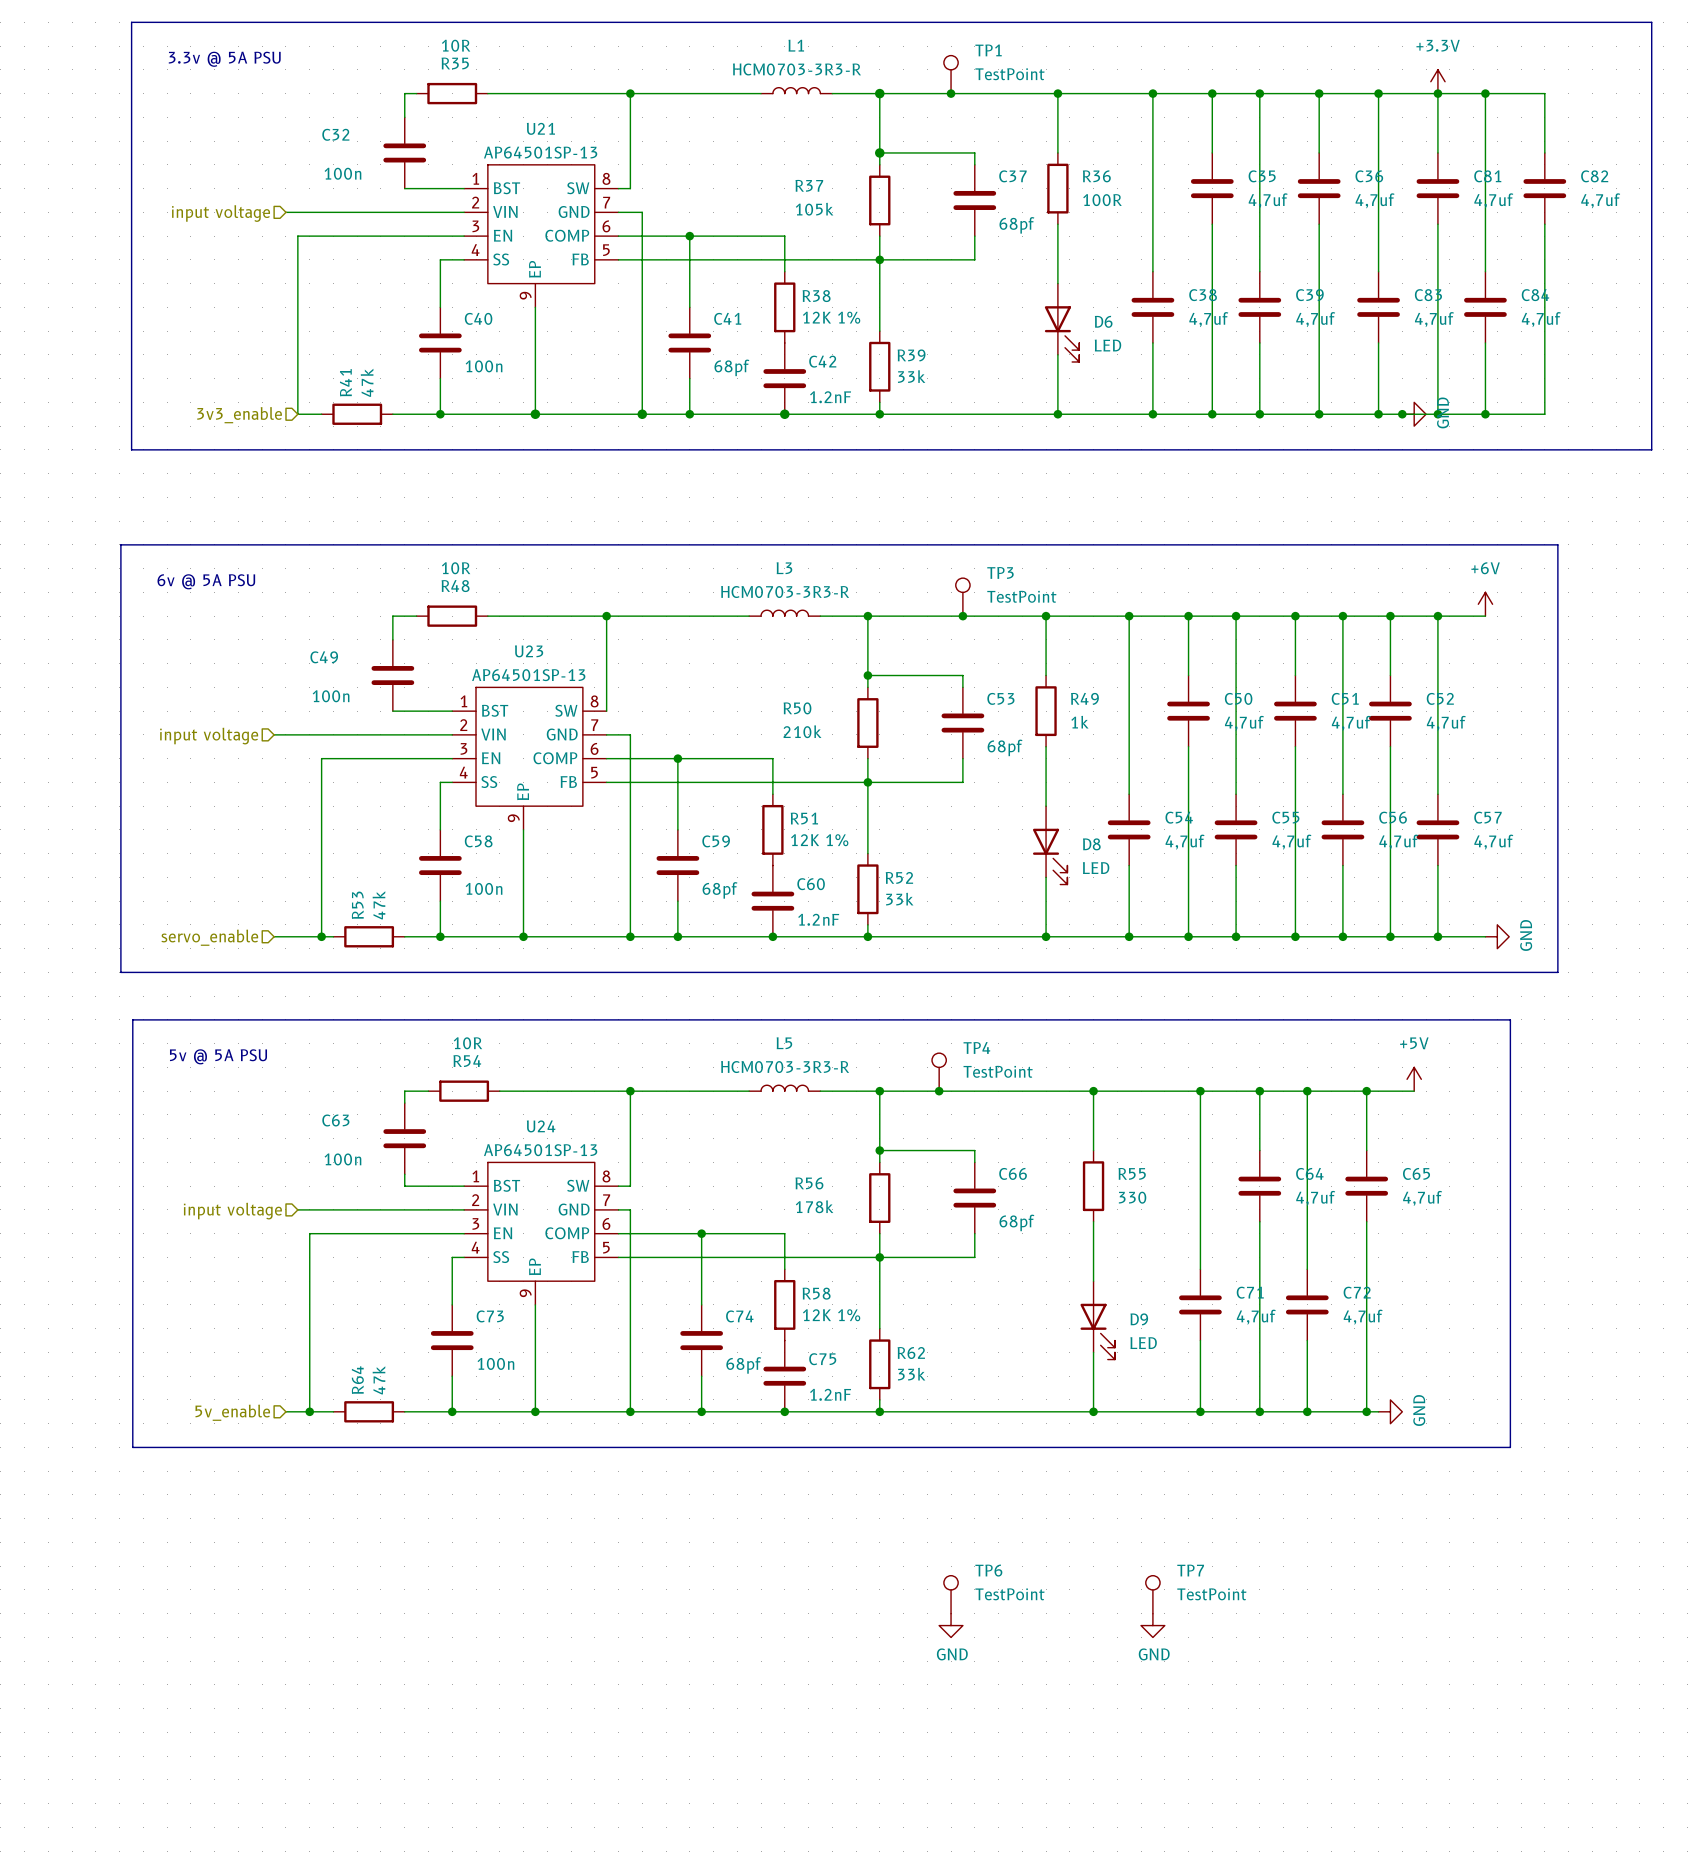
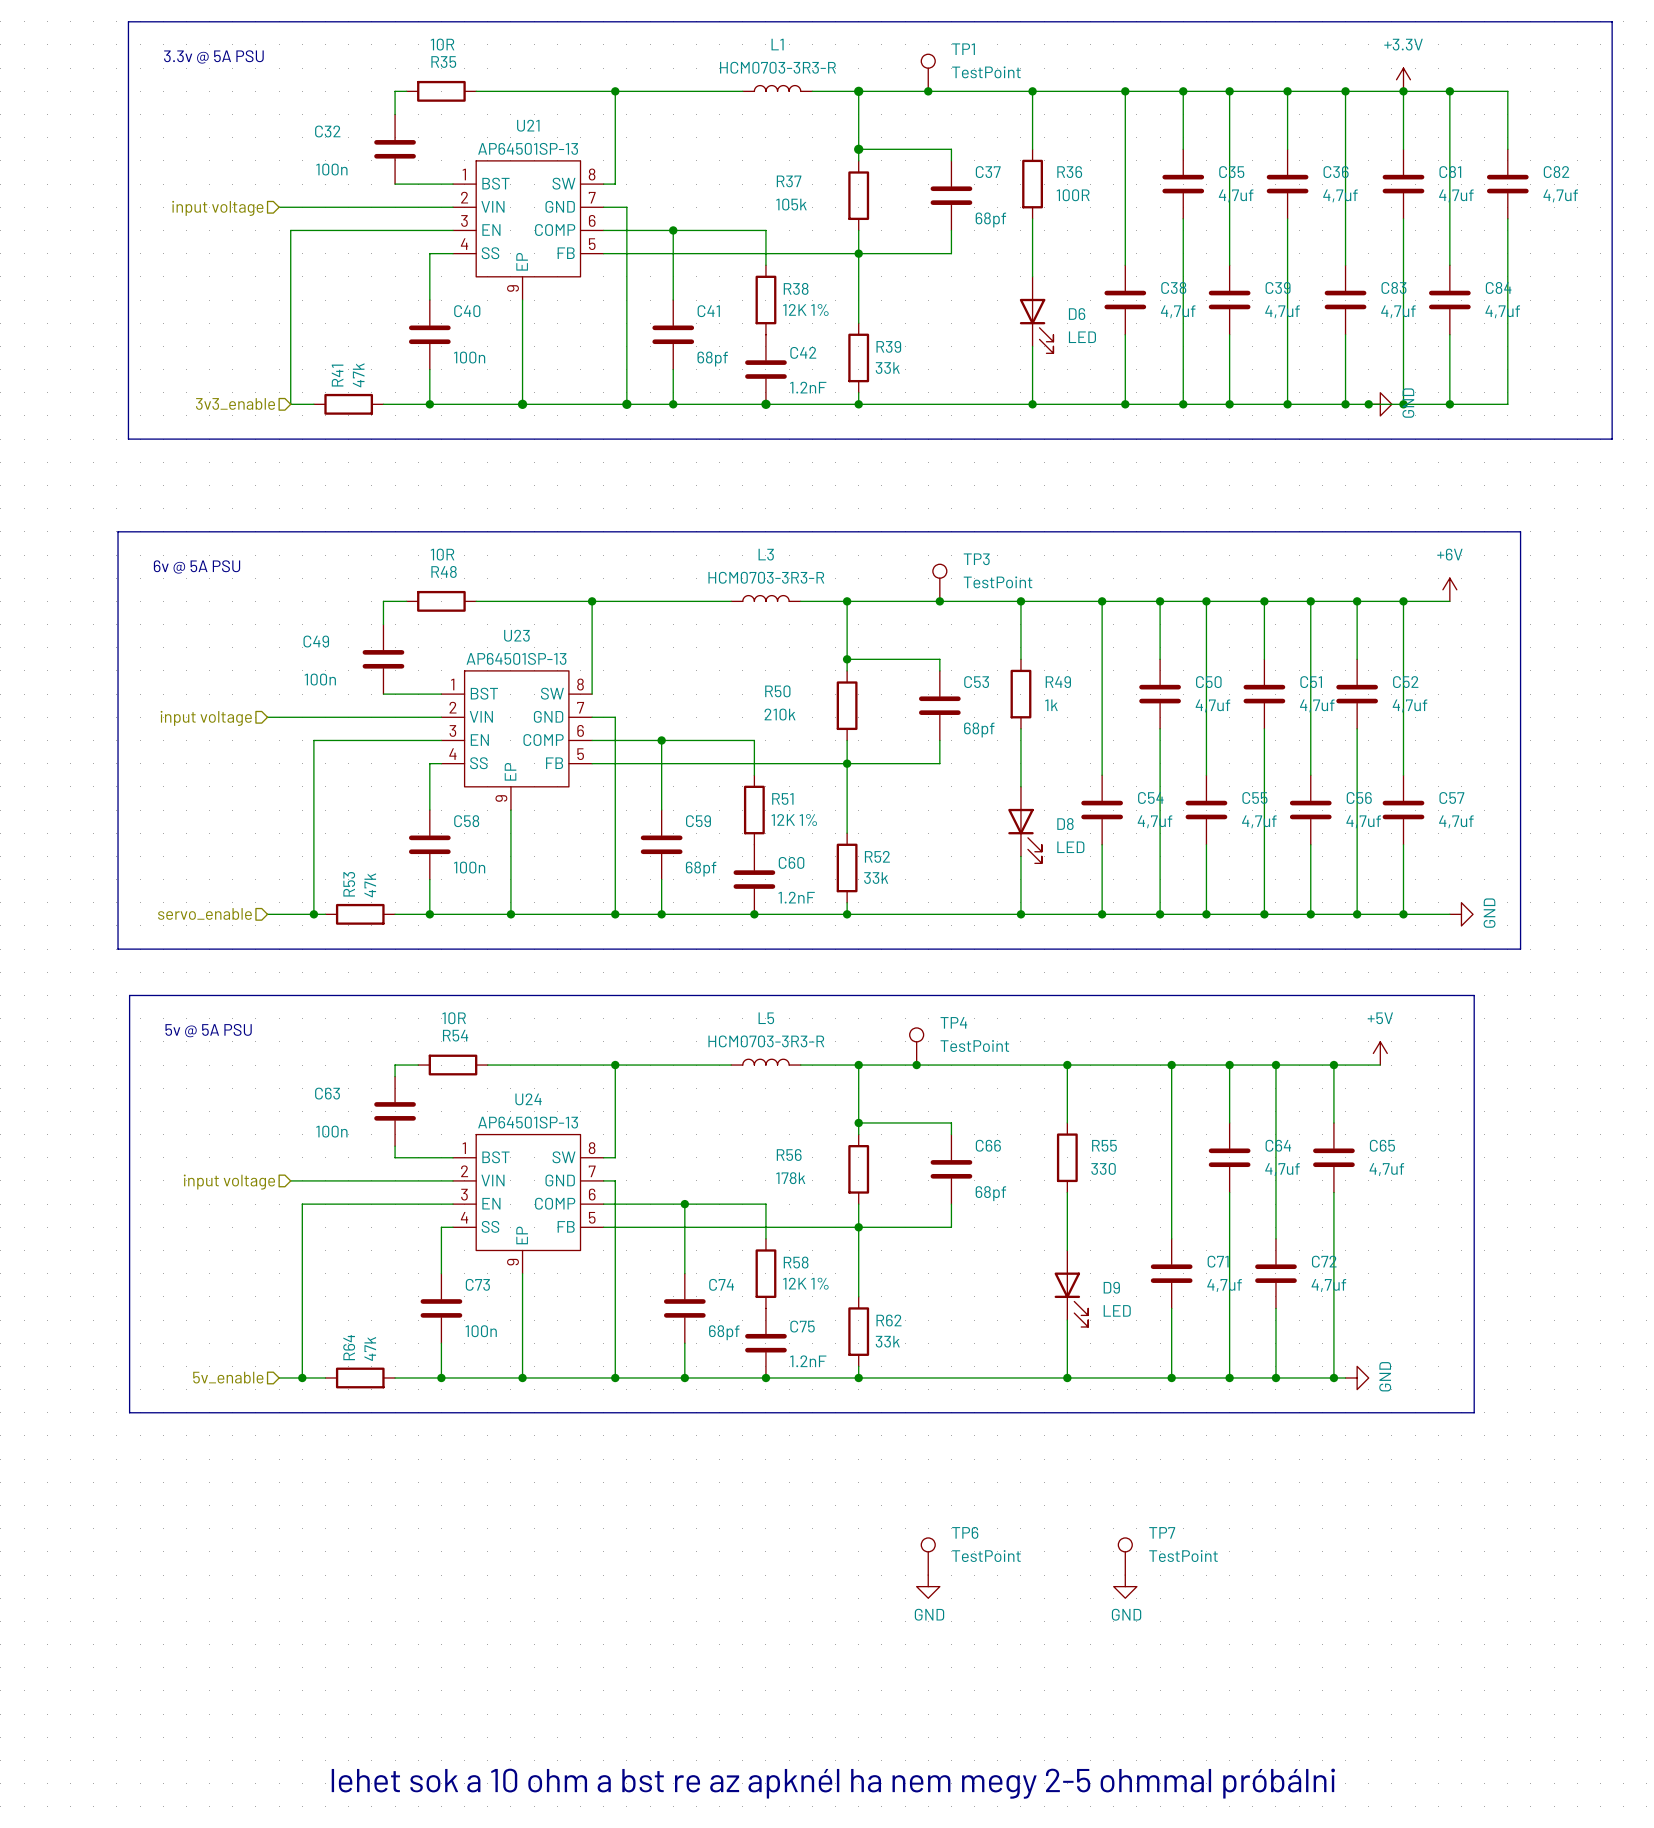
text: none -> lehet sok a 10 ohm a bst re az apknél ha nem megy 2-5 ohmmal próbálni (833, 1783)

